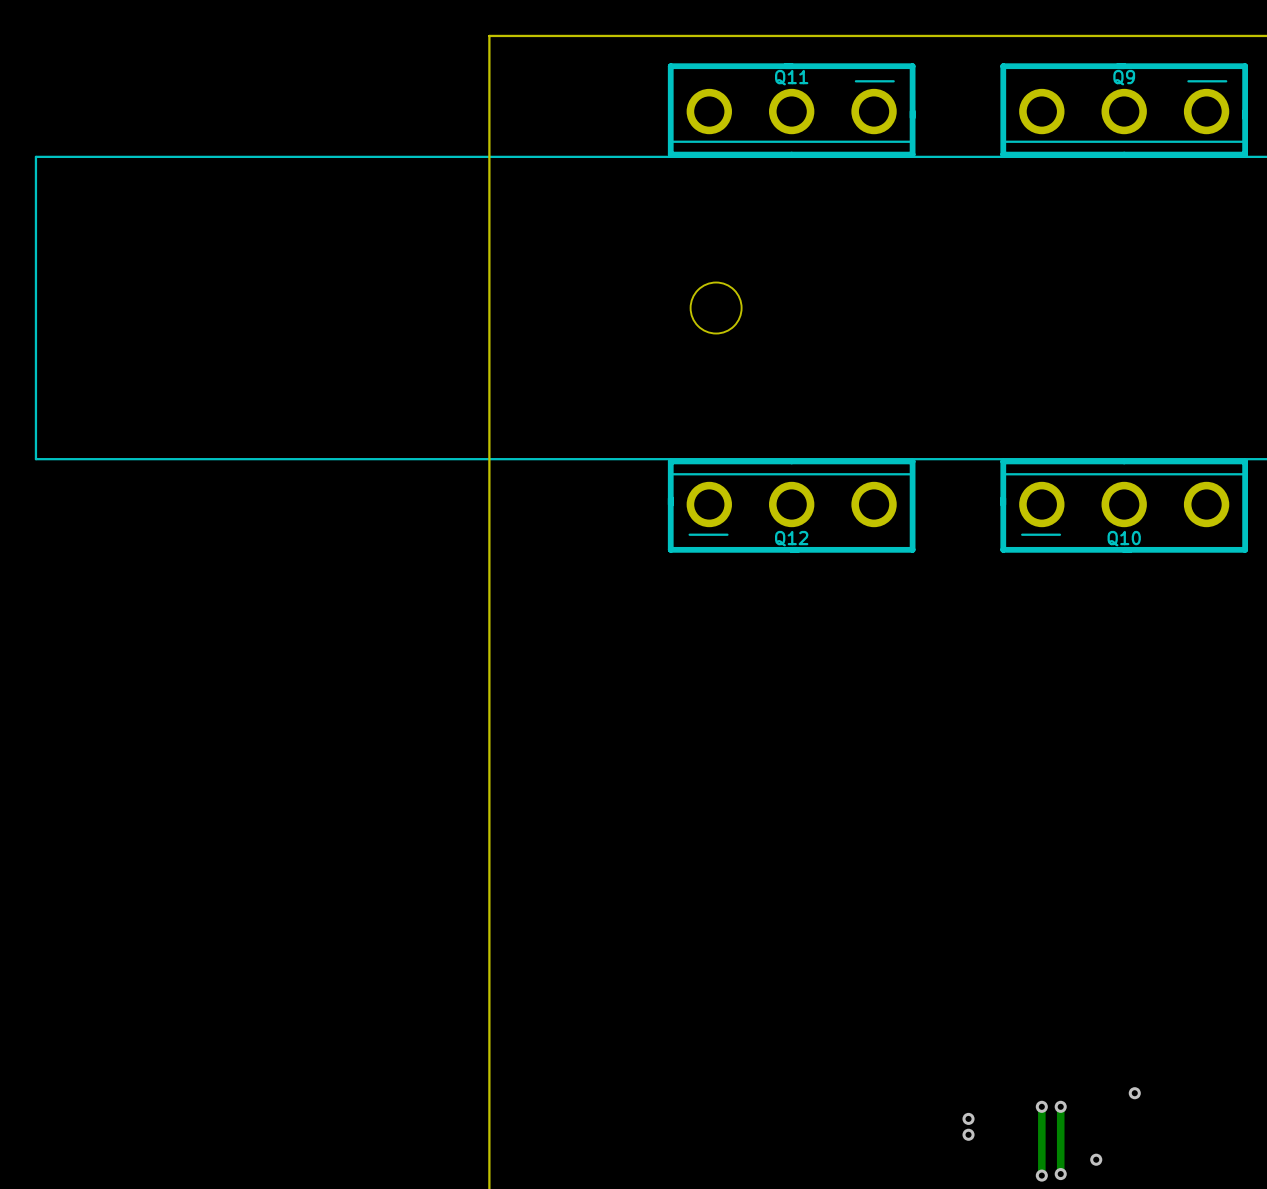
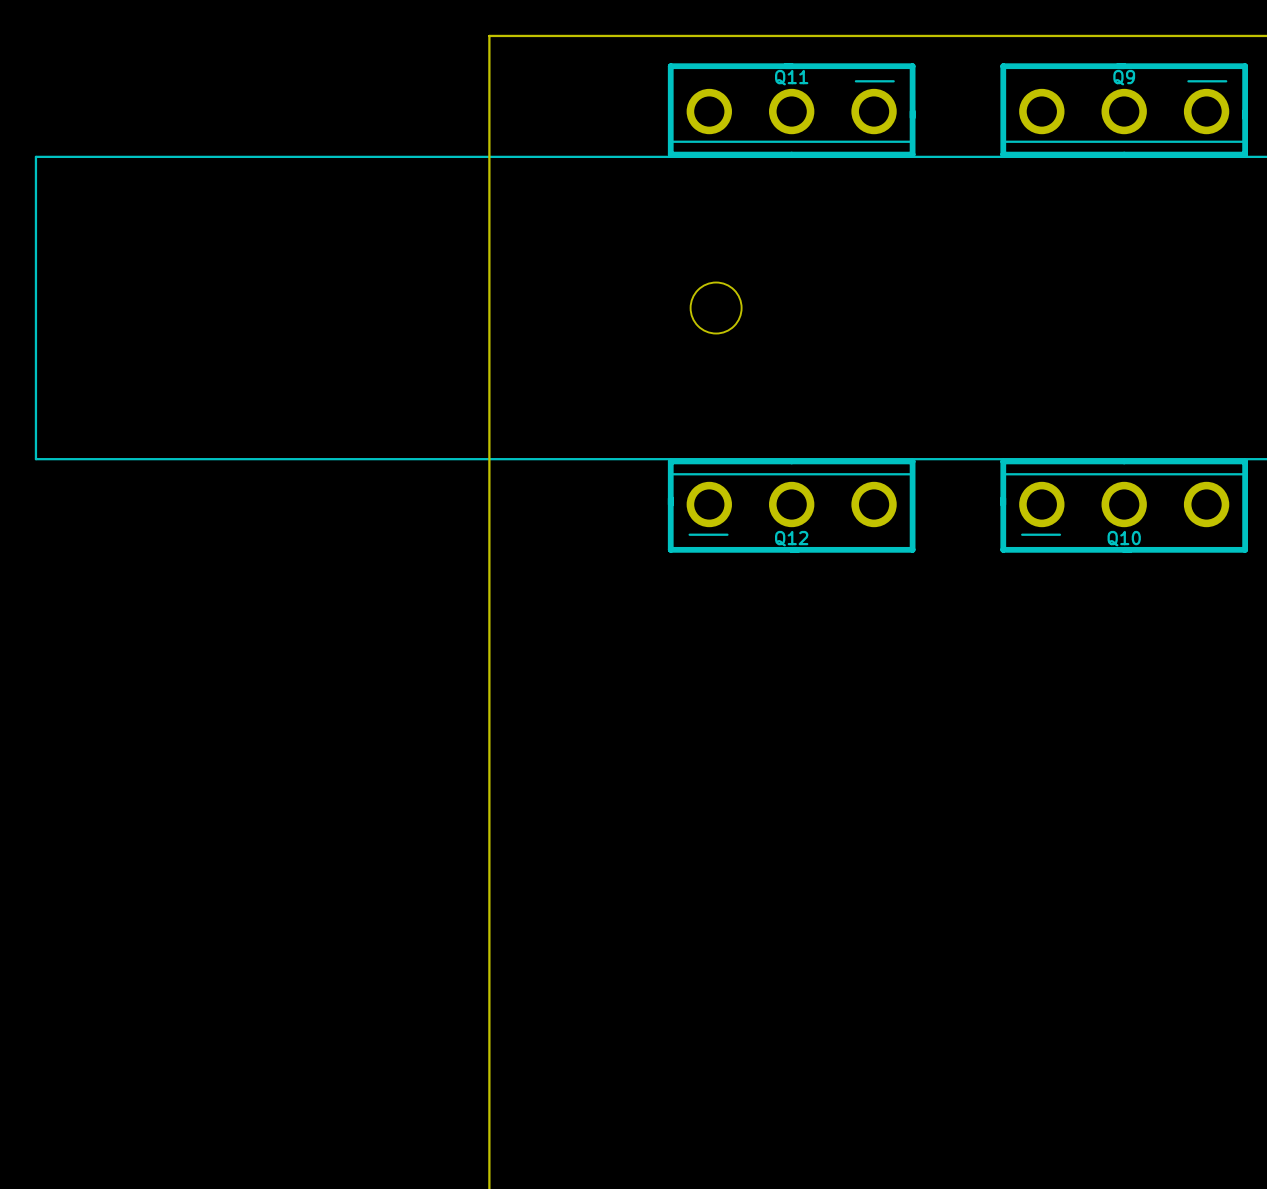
via: (1134, 1093) -> none
track: (1041, 1106) (1041, 1175) -> none
via: (1041, 1106) -> none
track: (1060, 1106) (1060, 1174) -> none
via: (1060, 1106) -> none
via: (968, 1118) -> none
via: (968, 1134) -> none
via: (1096, 1159) -> none
via: (1060, 1174) -> none
via: (1041, 1175) -> none

